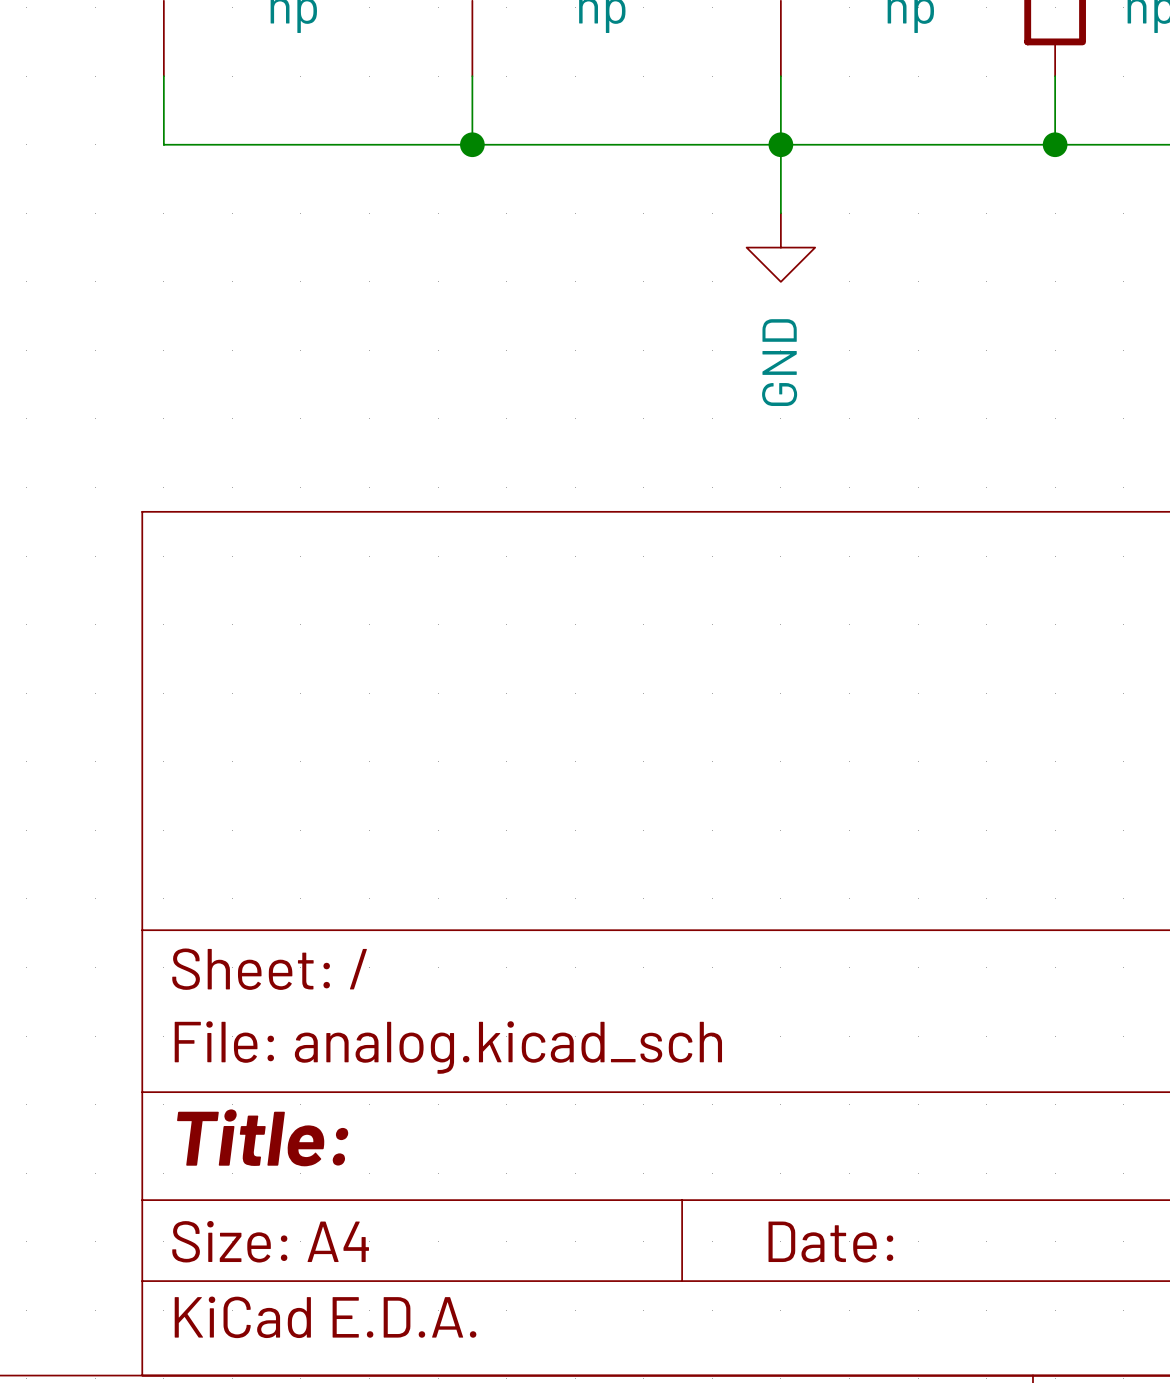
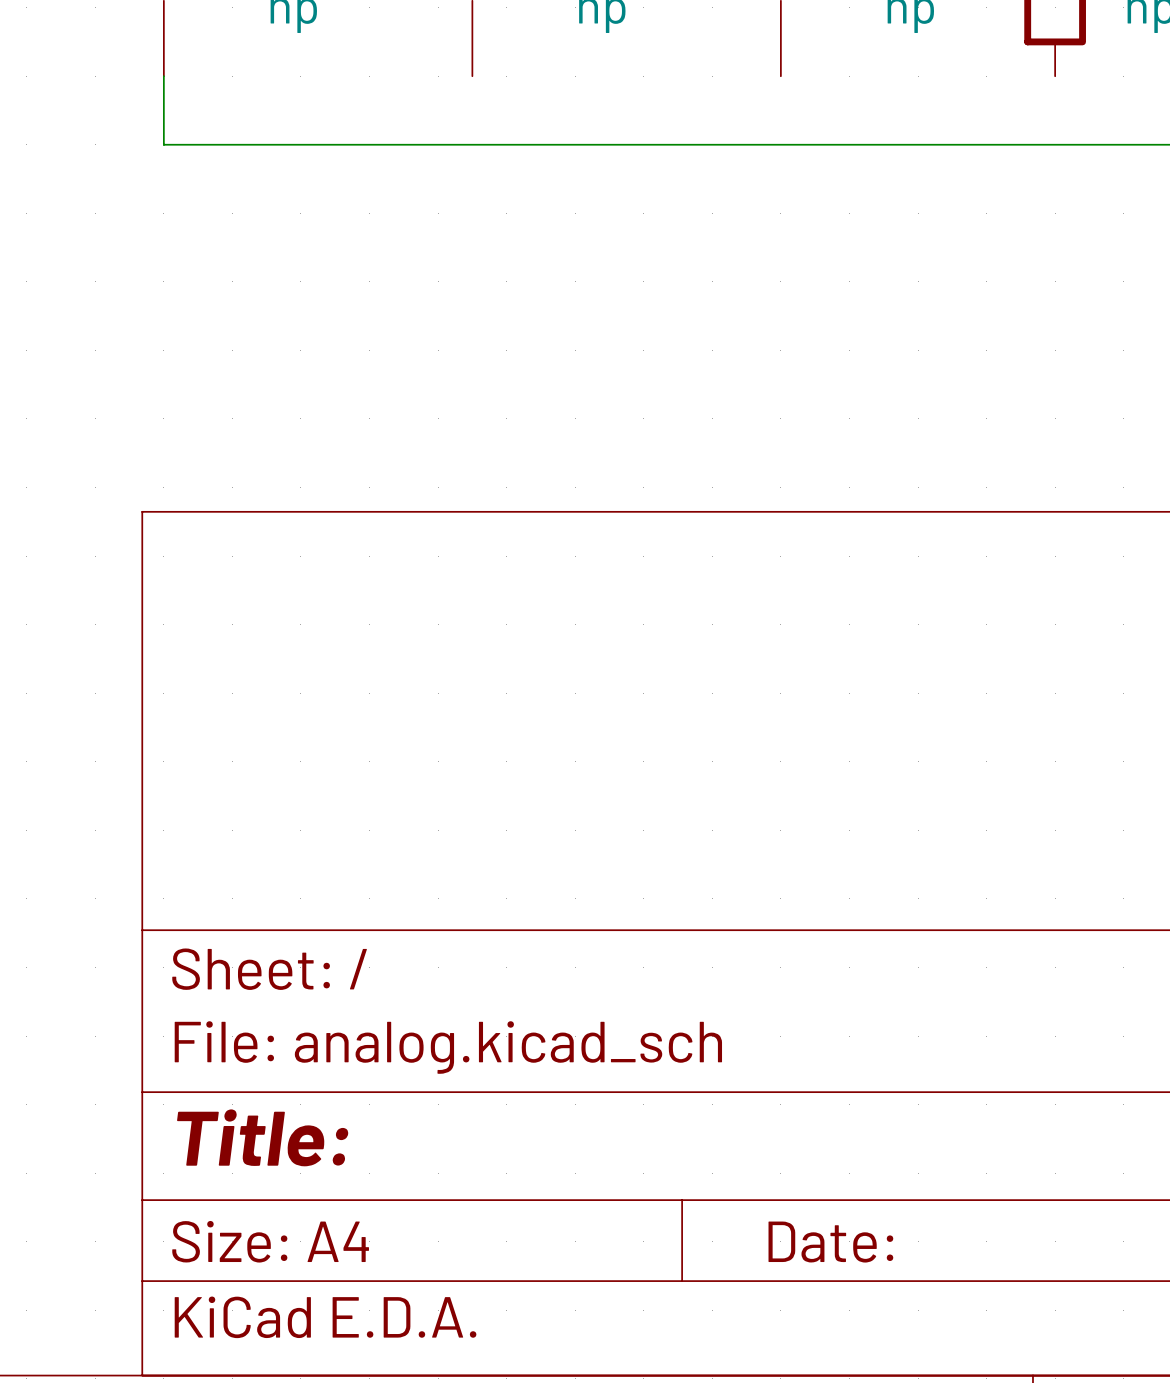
wire: (472, 76) (472, 144) -> none
wire: (780, 76) (780, 213) -> none
wire: (1055, 76) (1055, 144) -> none
junction: (472, 144) -> none
junction: (780, 144) -> none
junction: (1055, 144) -> none
power symbol: GND (780, 247) -> none

